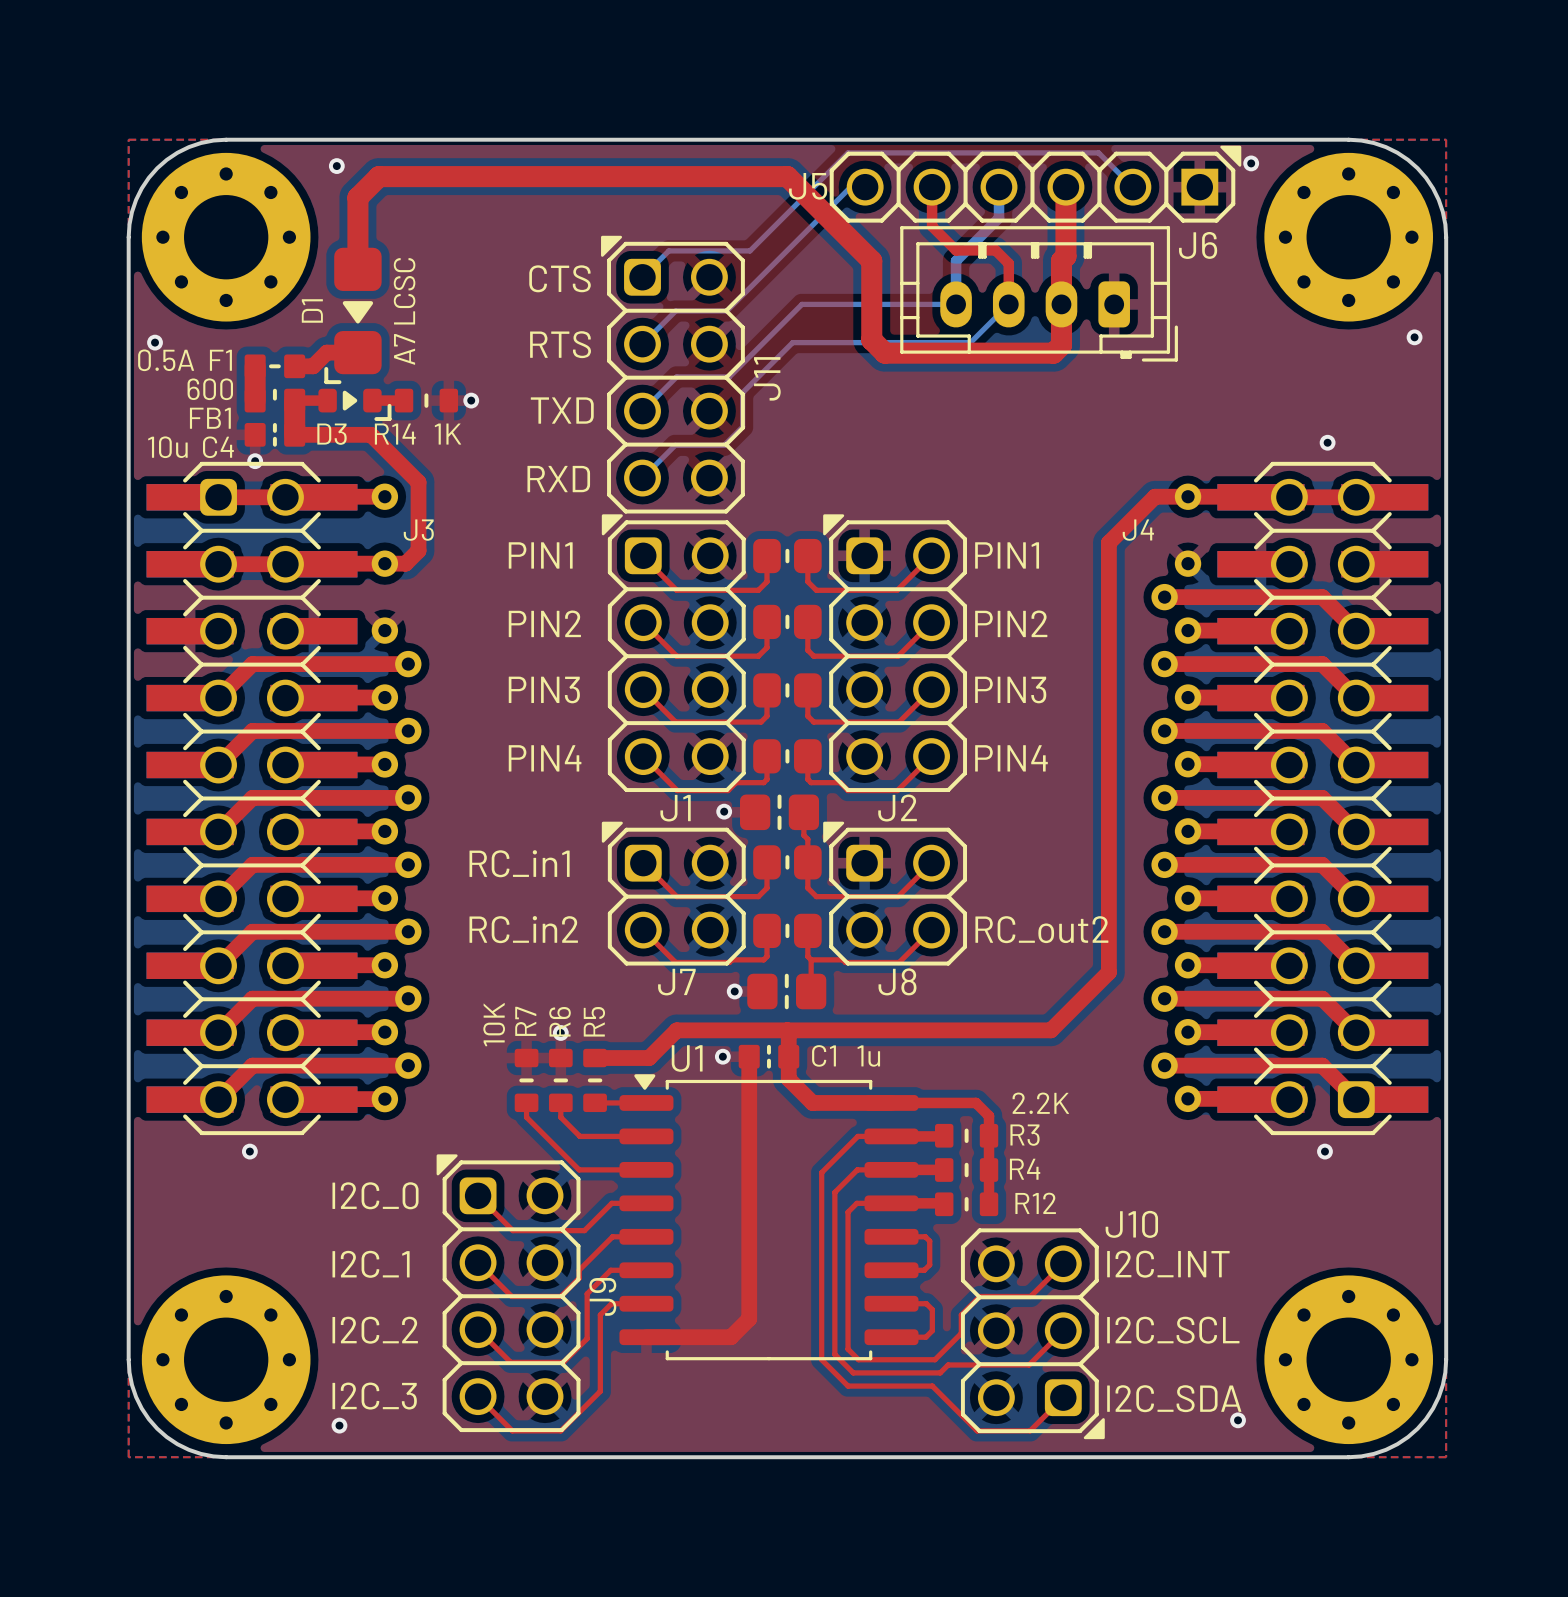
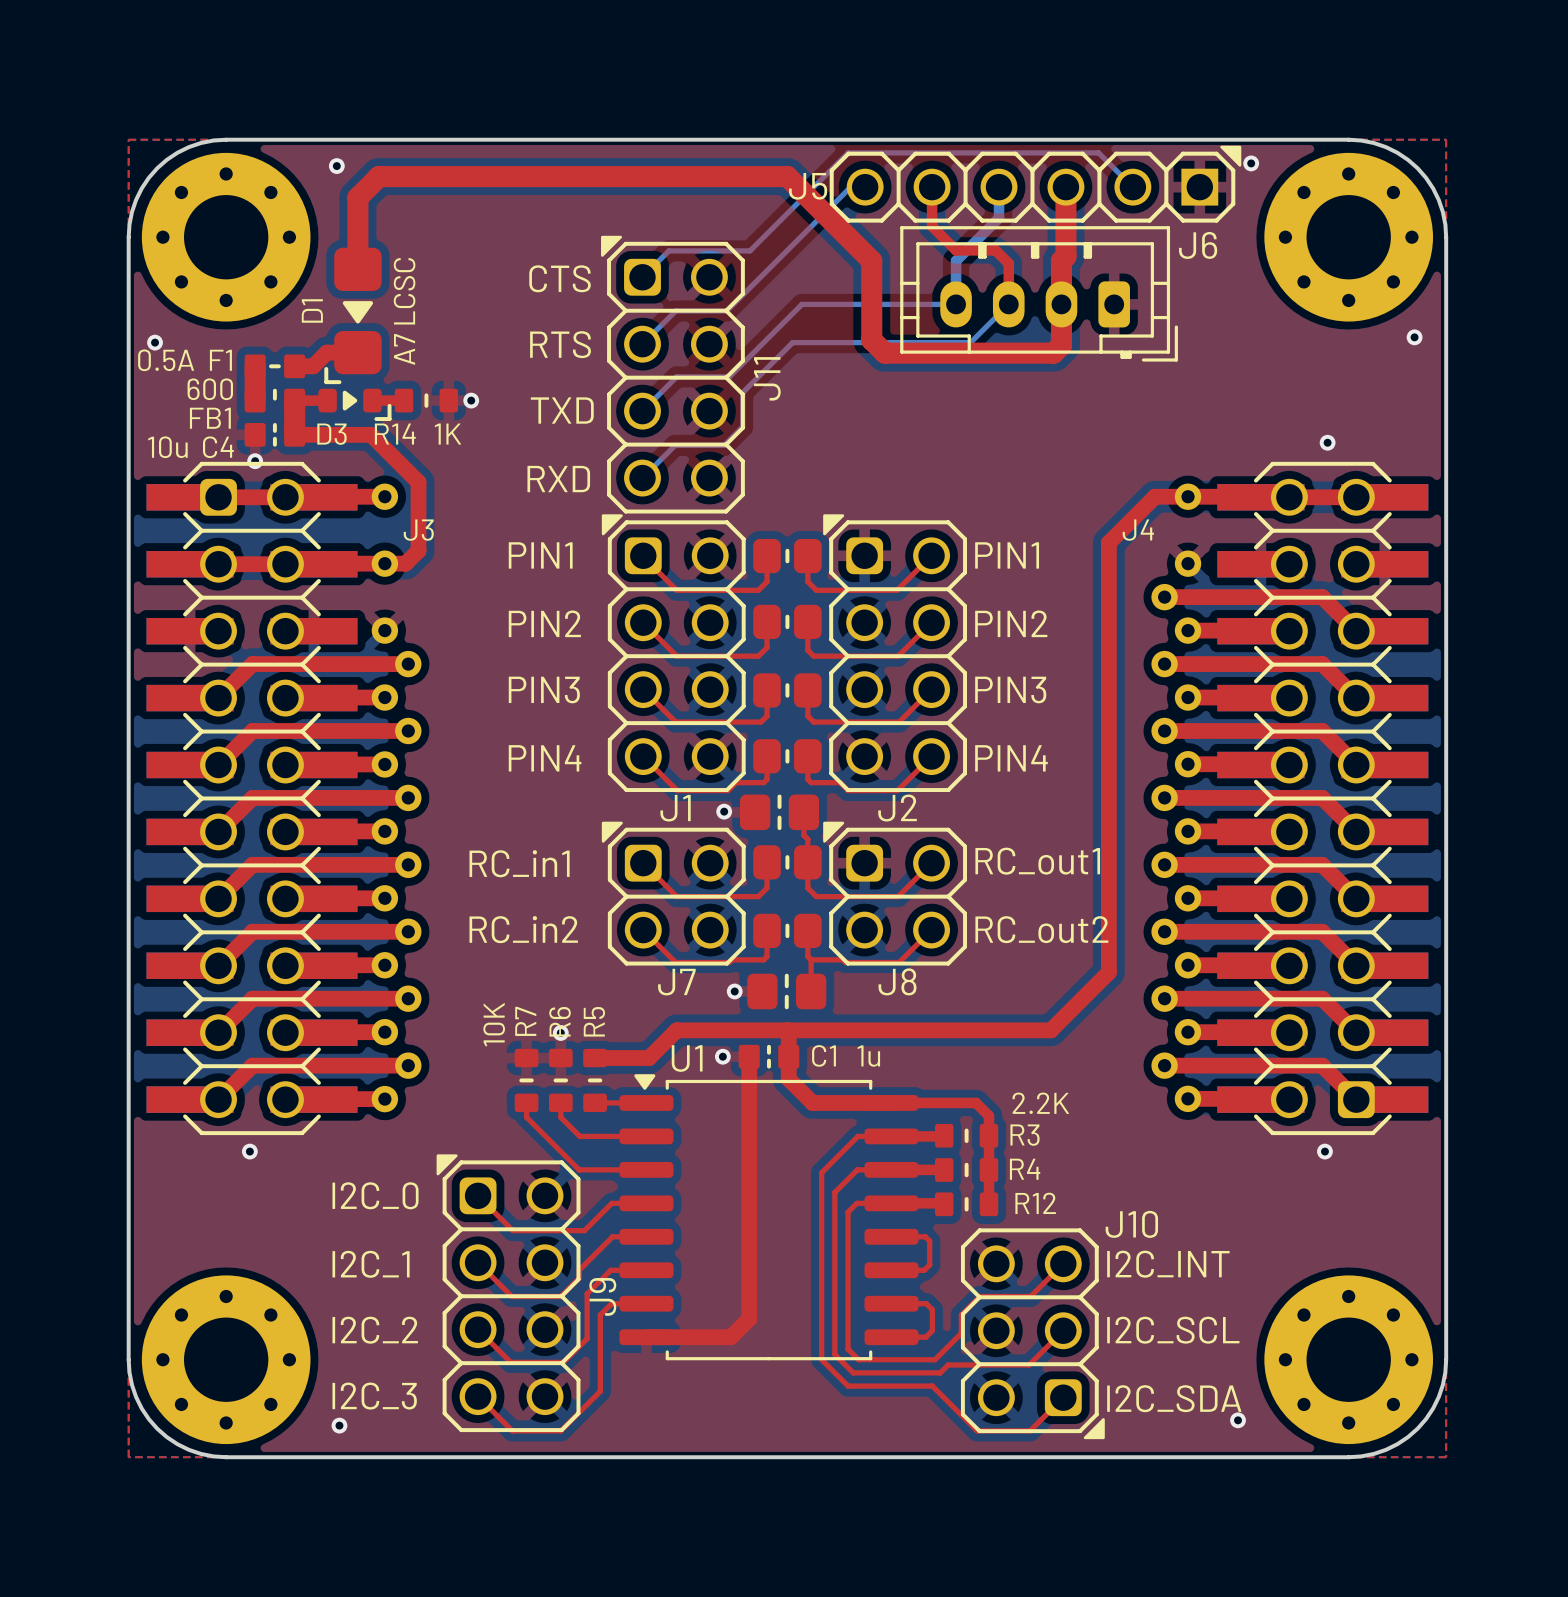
text: none -> RC_out1 (1037, 861)

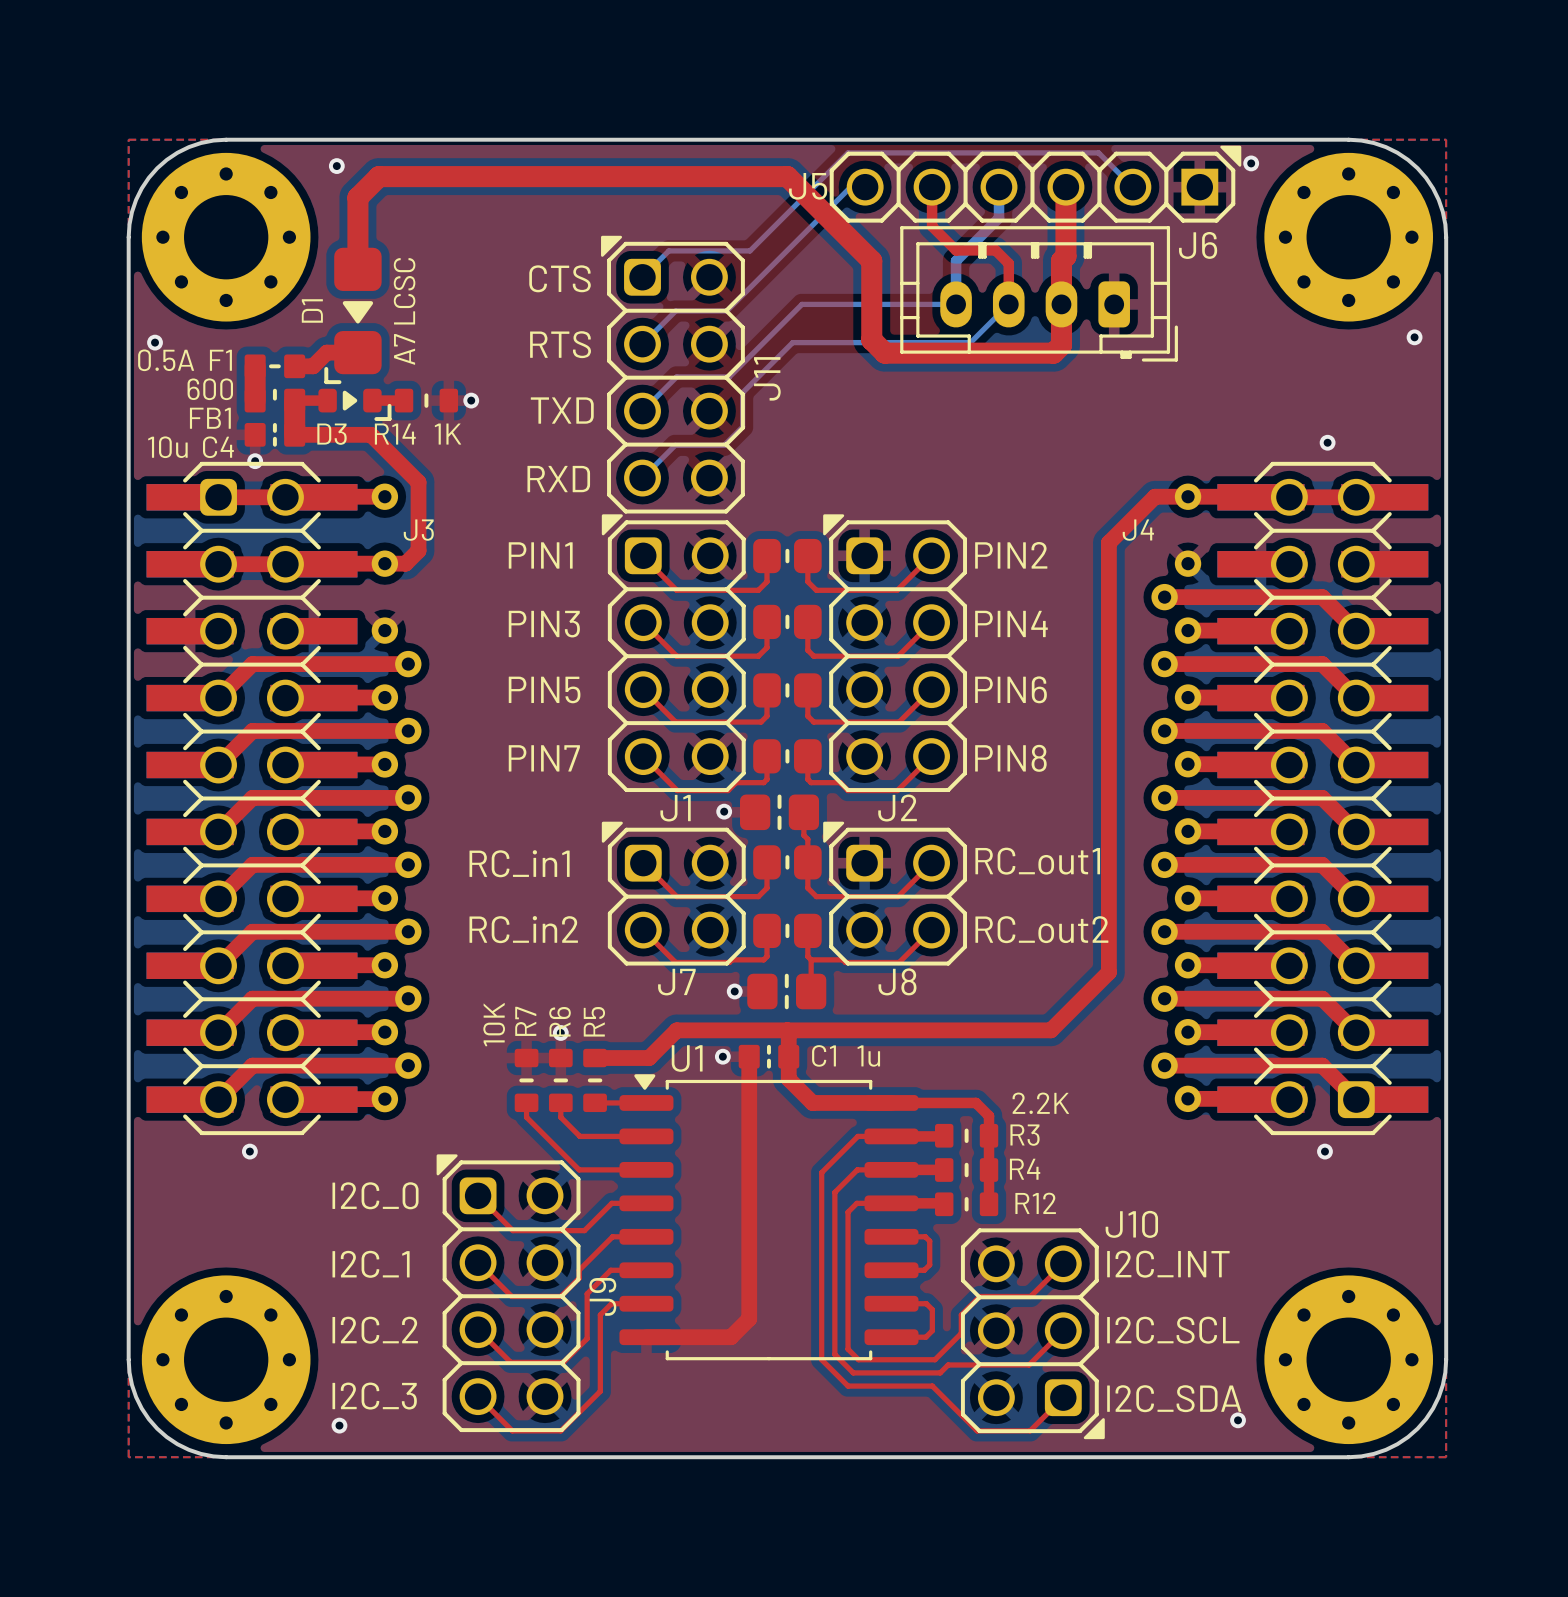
text: PIN1 (1007, 555) -> PIN2 (1011, 555)
text: PIN2 (544, 623) -> PIN3 (544, 624)
text: PIN2 (1011, 623) -> PIN4 (1011, 623)
text: PIN3 (544, 689) -> PIN5 (544, 689)
text: PIN3 (1010, 689) -> PIN6 (1011, 689)
text: PIN4 (545, 758) -> PIN7 (544, 758)
text: PIN4 (1011, 758) -> PIN8 (1010, 758)

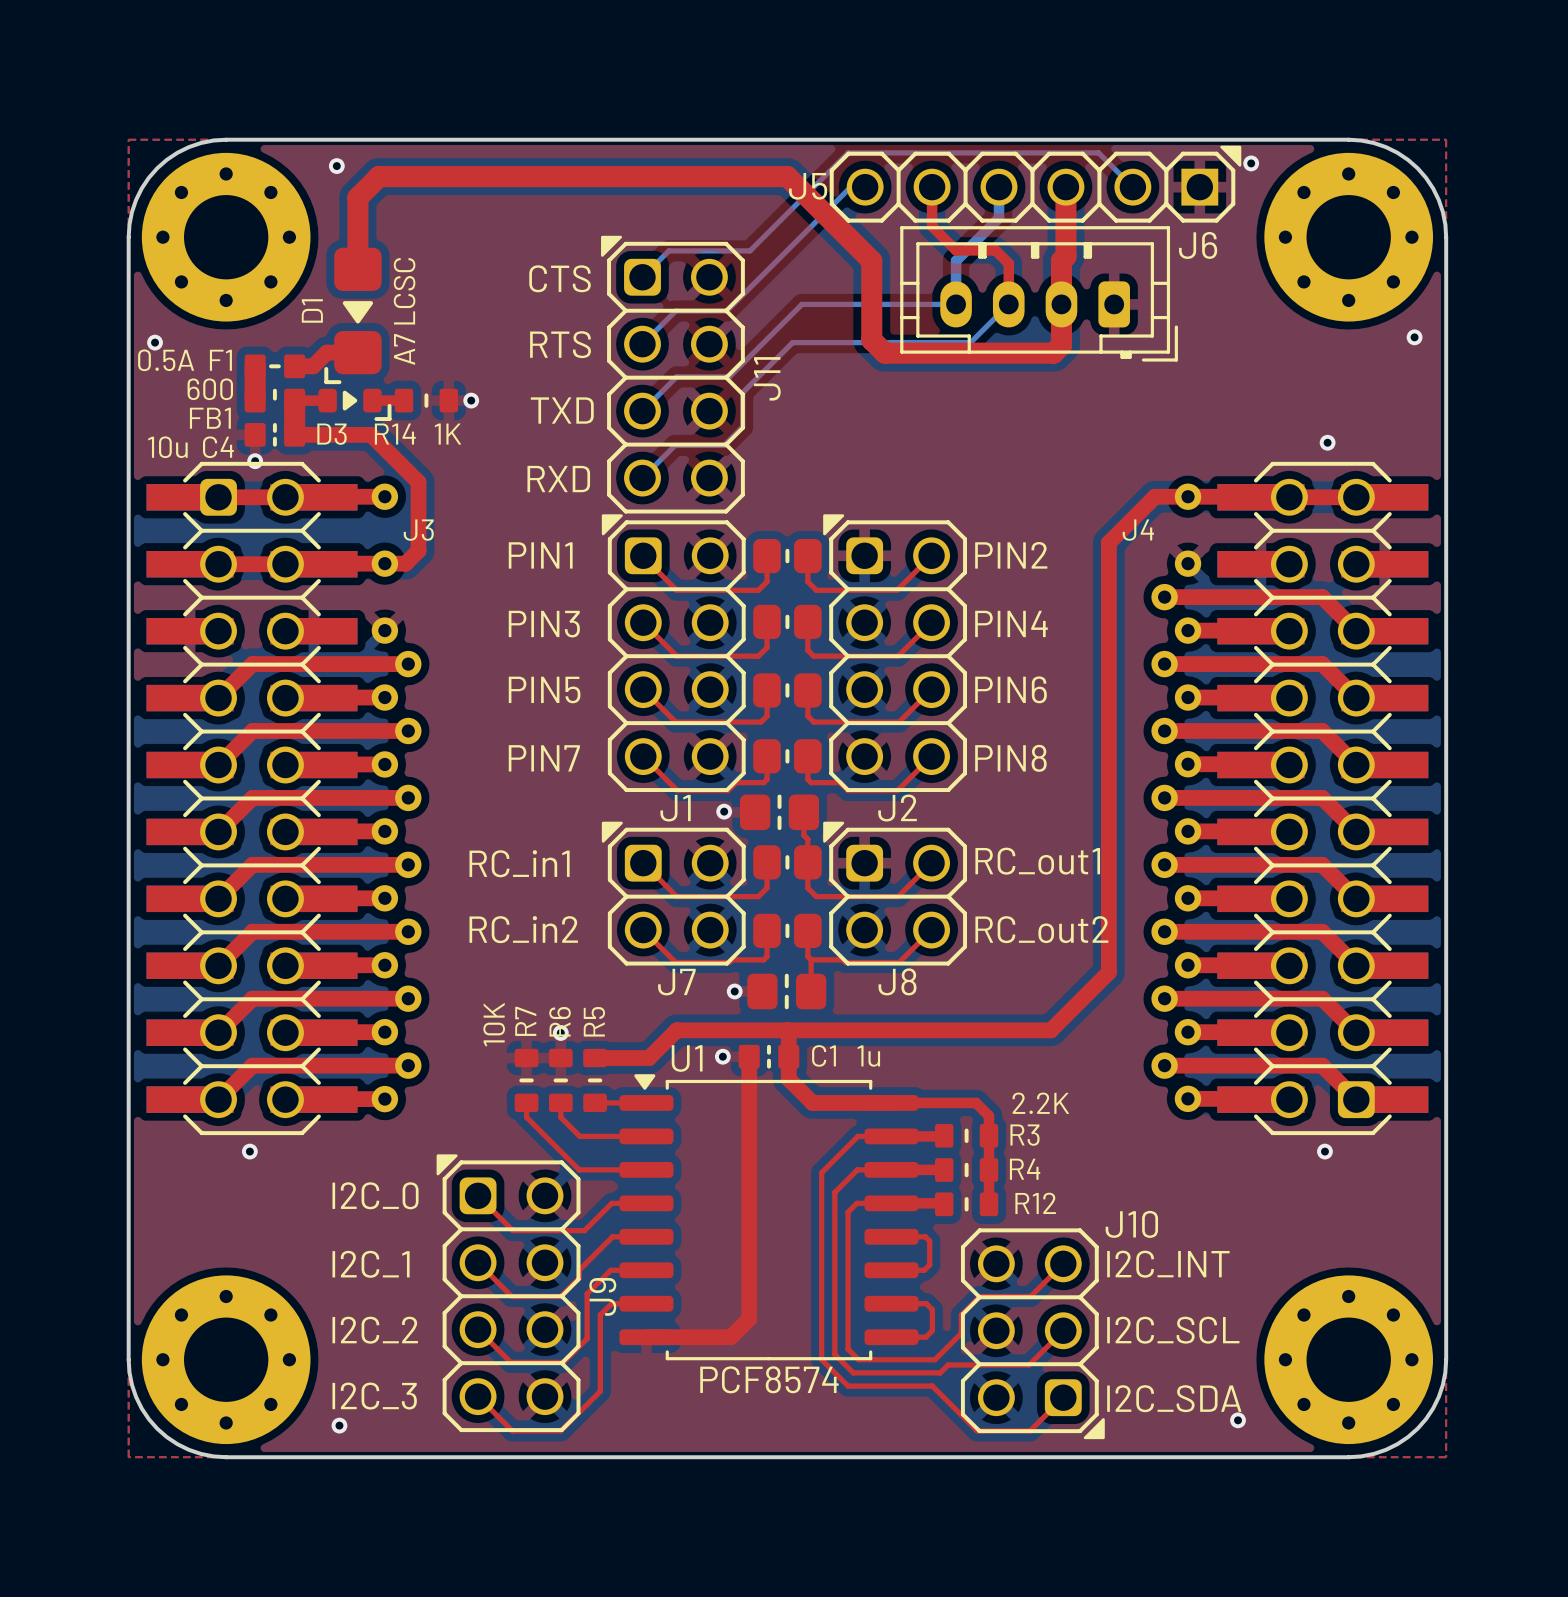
U1 value: none -> PCF8574 (769, 1379)

